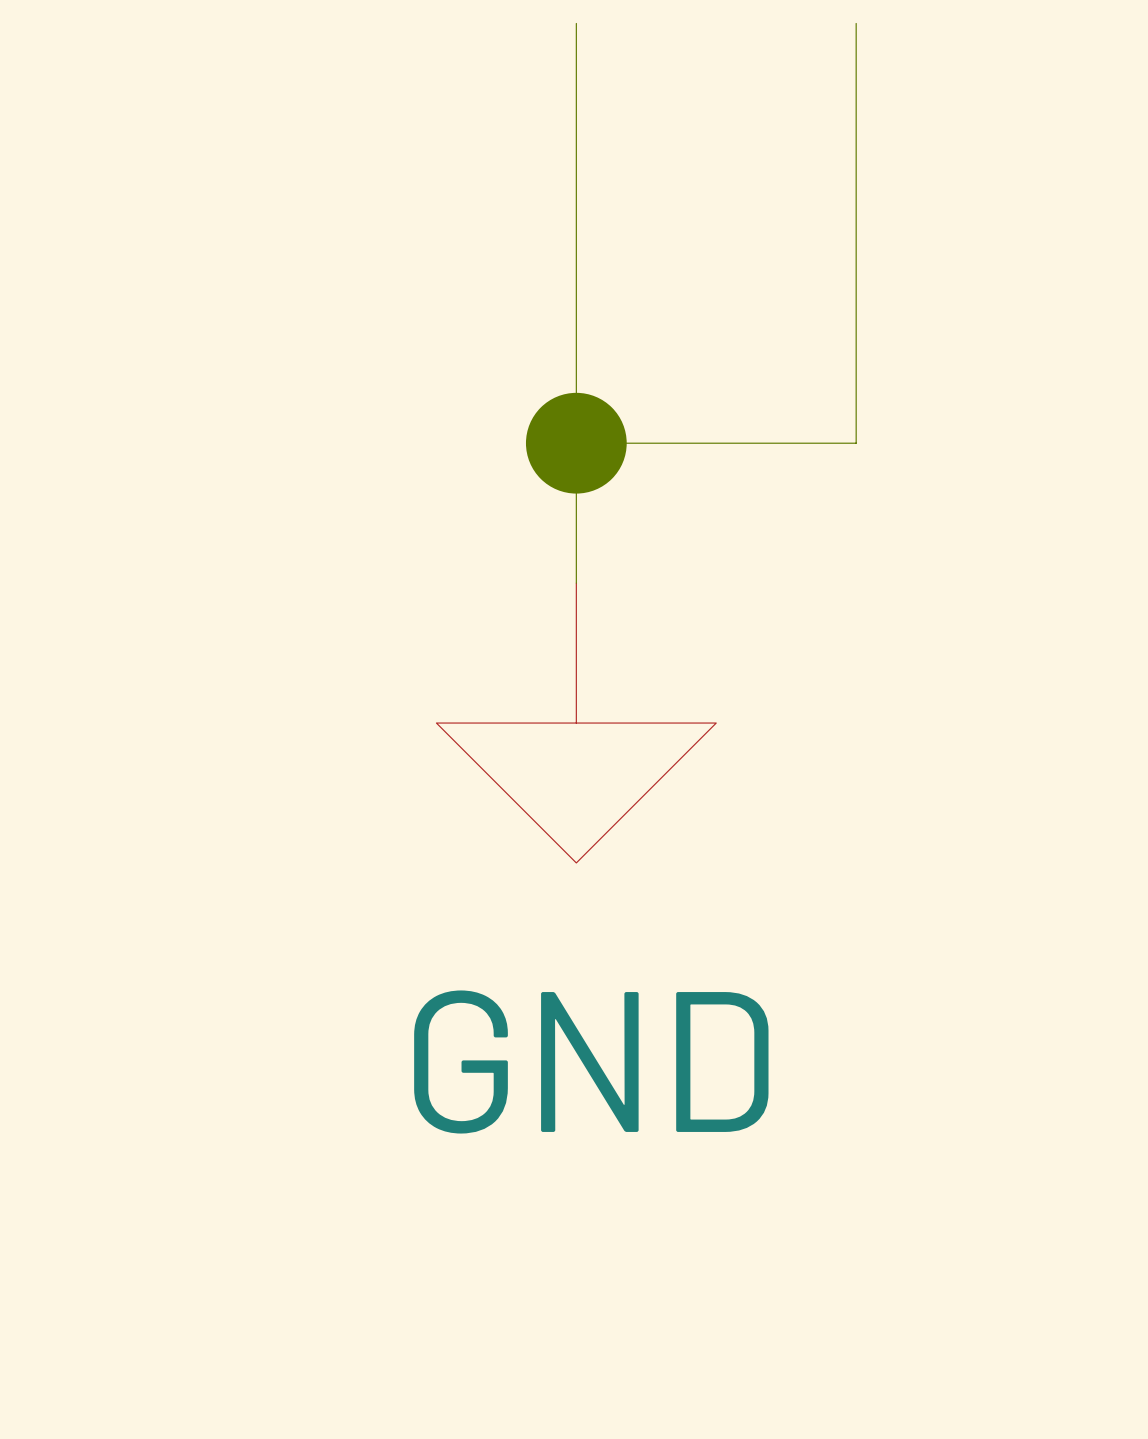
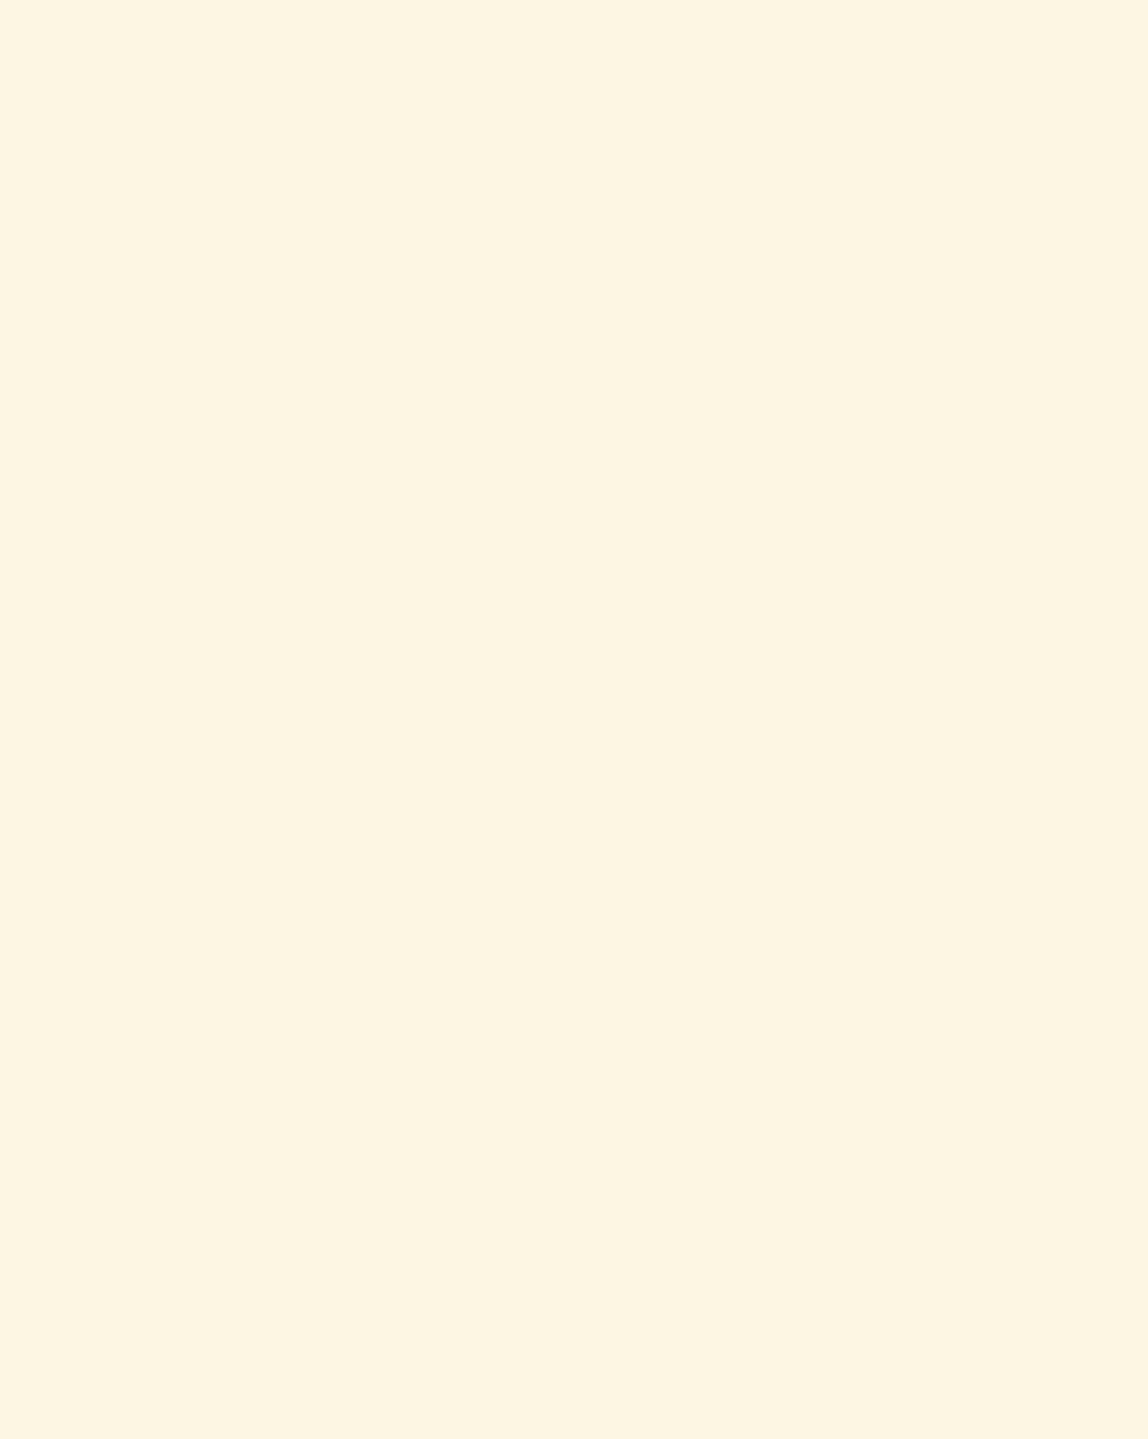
wire: (576, 23) (576, 583) -> none
wire: (856, 23) (856, 443) (576, 443) -> none
junction: (576, 443) -> none
power symbol: GND (576, 723) -> none

